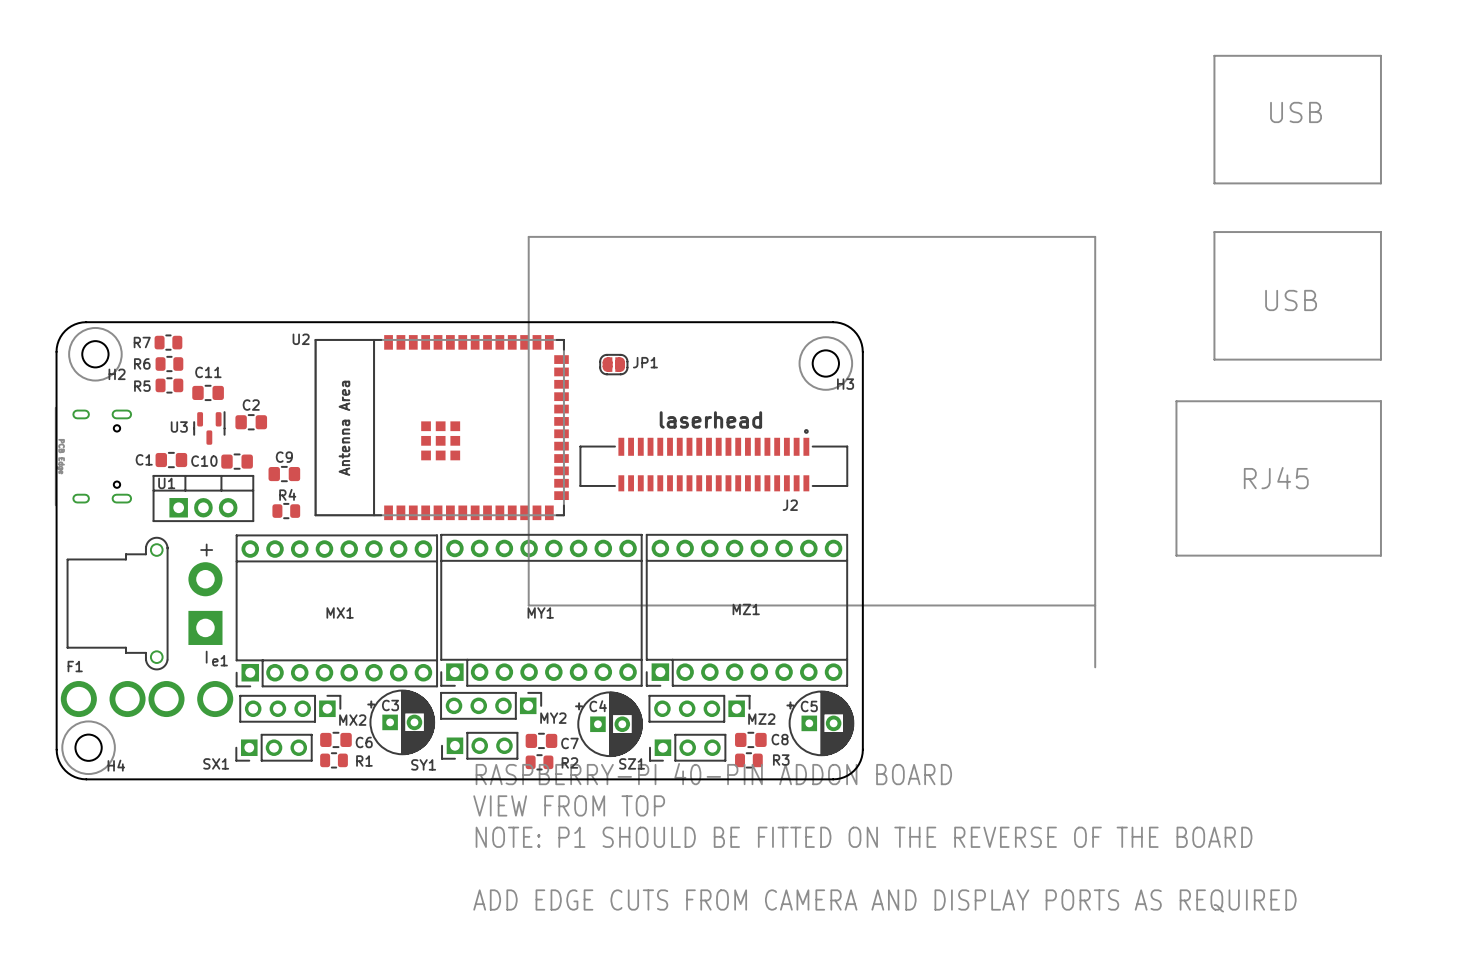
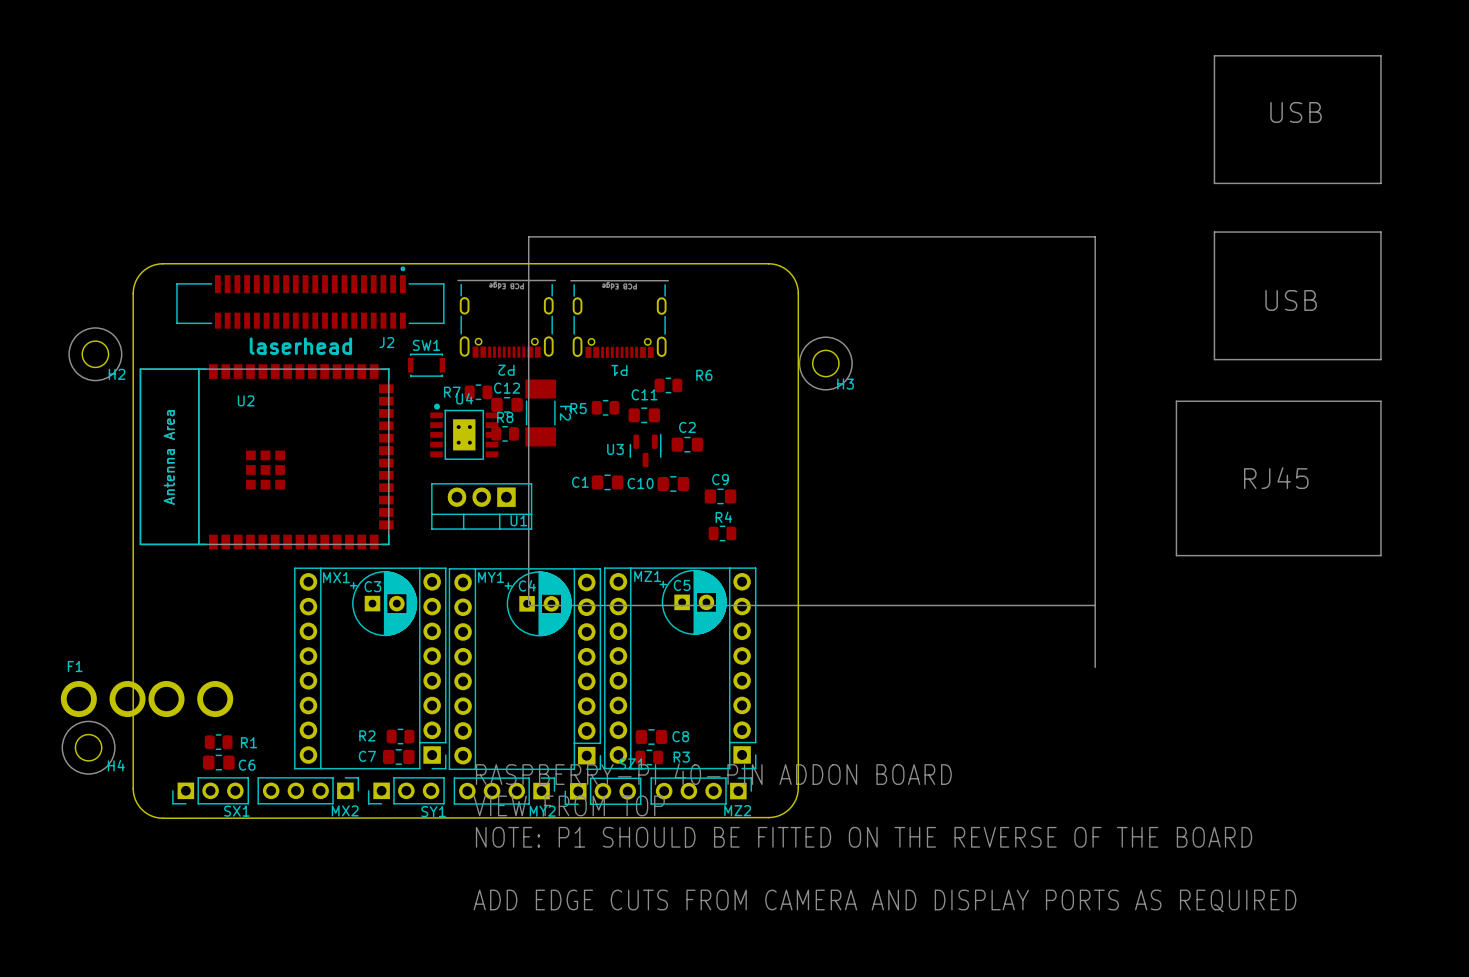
P2: none -> (506, 318)
P1: none -> (619, 319)
U2 name position: U2 (301, 339) -> U2 (246, 400)
R7 position: (168, 342) -> (478, 392)
text: none -> laserhead (300, 346)
board edge: (862, 351) (860, 340) (854, 330) (844, 324) (833, 322) (86, 322) (71, 326) (60, 337) (56, 351) (56, 749) (60, 764) (71, 775) (86, 779) (833, 779) (848, 775) (858, 764) (862, 749) (862, 351) -> (162, 263) (151, 266) (141, 272) (135, 282) (133, 293) (133, 788) (137, 803) (144, 812) (155, 817) (162, 818) (768, 817) (779, 815) (792, 805) (797, 795) (798, 787) (798, 293) (794, 278) (786, 269) (776, 264) (768, 263) (162, 263)
R6 name position: R6 (142, 363) -> R6 (704, 375)
R6 position: (169, 364) -> (668, 385)
JP1: (613, 364) -> none
SW1: none -> (426, 365)
R5 position: (169, 385) -> (605, 407)
C11 position: (208, 392) -> (644, 415)
C12: none -> (507, 404)
F2: none -> (540, 412)
text: laserhead (710, 419) -> none
C2 position: (251, 422) -> (687, 444)
U2 position: (441, 427) -> (266, 456)
U3 position: (209, 428) -> (645, 450)
U4: none -> (464, 431)
R8: none -> (505, 433)
part: (93, 456) -> none
C1 position: (171, 460) -> (607, 482)
J2 position: (713, 460) -> (310, 297)
C10 position: (237, 461) -> (673, 483)
C9 position: (284, 474) -> (720, 496)
U1 rotation: 0° (203, 498) -> 180° (481, 506)
U1 position: (203, 498) -> (481, 506)
R4 position: (286, 511) -> (722, 533)
e1: (144, 603) -> none
MZ1 name position: MZ1 (746, 609) -> MZ1 (647, 576)
MX1 rotation: 0° (336, 610) -> 90° counterclockwise (370, 668)
MY1 rotation: 0° (541, 610) -> 90° counterclockwise (524, 669)
MZ1 rotation: 0° (746, 610) -> 90° counterclockwise (680, 668)
MX1 name position: MX1 (340, 612) -> MX1 (336, 577)
MY1 name position: MY1 (540, 612) -> MY1 (491, 577)
MY2 position: (491, 705) -> (504, 791)
MX2 position: (290, 708) -> (308, 790)
MZ2 position: (699, 708) -> (701, 791)
MY2 name position: MY2 (553, 718) -> MY2 (542, 811)
MZ2 name position: MZ2 (761, 719) -> MZ2 (737, 810)
MX2 name position: MX2 (352, 720) -> MX2 (345, 810)
C3 position: (401, 722) -> (383, 603)
C5 position: (820, 723) -> (693, 602)
C4 position: (609, 724) -> (538, 603)
C6 position: (335, 739) -> (218, 762)
C8 position: (750, 739) -> (651, 737)
C7 position: (541, 740) -> (398, 756)
C7 name position: C7 (569, 743) -> C7 (367, 756)
SY1 position: (479, 745) -> (406, 790)
SX1 position: (274, 747) -> (210, 790)
SZ1 position: (687, 747) -> (602, 791)
R1 position: (334, 760) -> (218, 742)
R3 position: (748, 760) -> (649, 757)
R2 position: (539, 762) -> (400, 736)
R2 name position: R2 (569, 762) -> R2 (367, 735)
SX1 name position: SX1 (216, 763) -> SX1 (236, 811)
SY1 name position: SY1 (423, 764) -> SY1 (433, 811)

